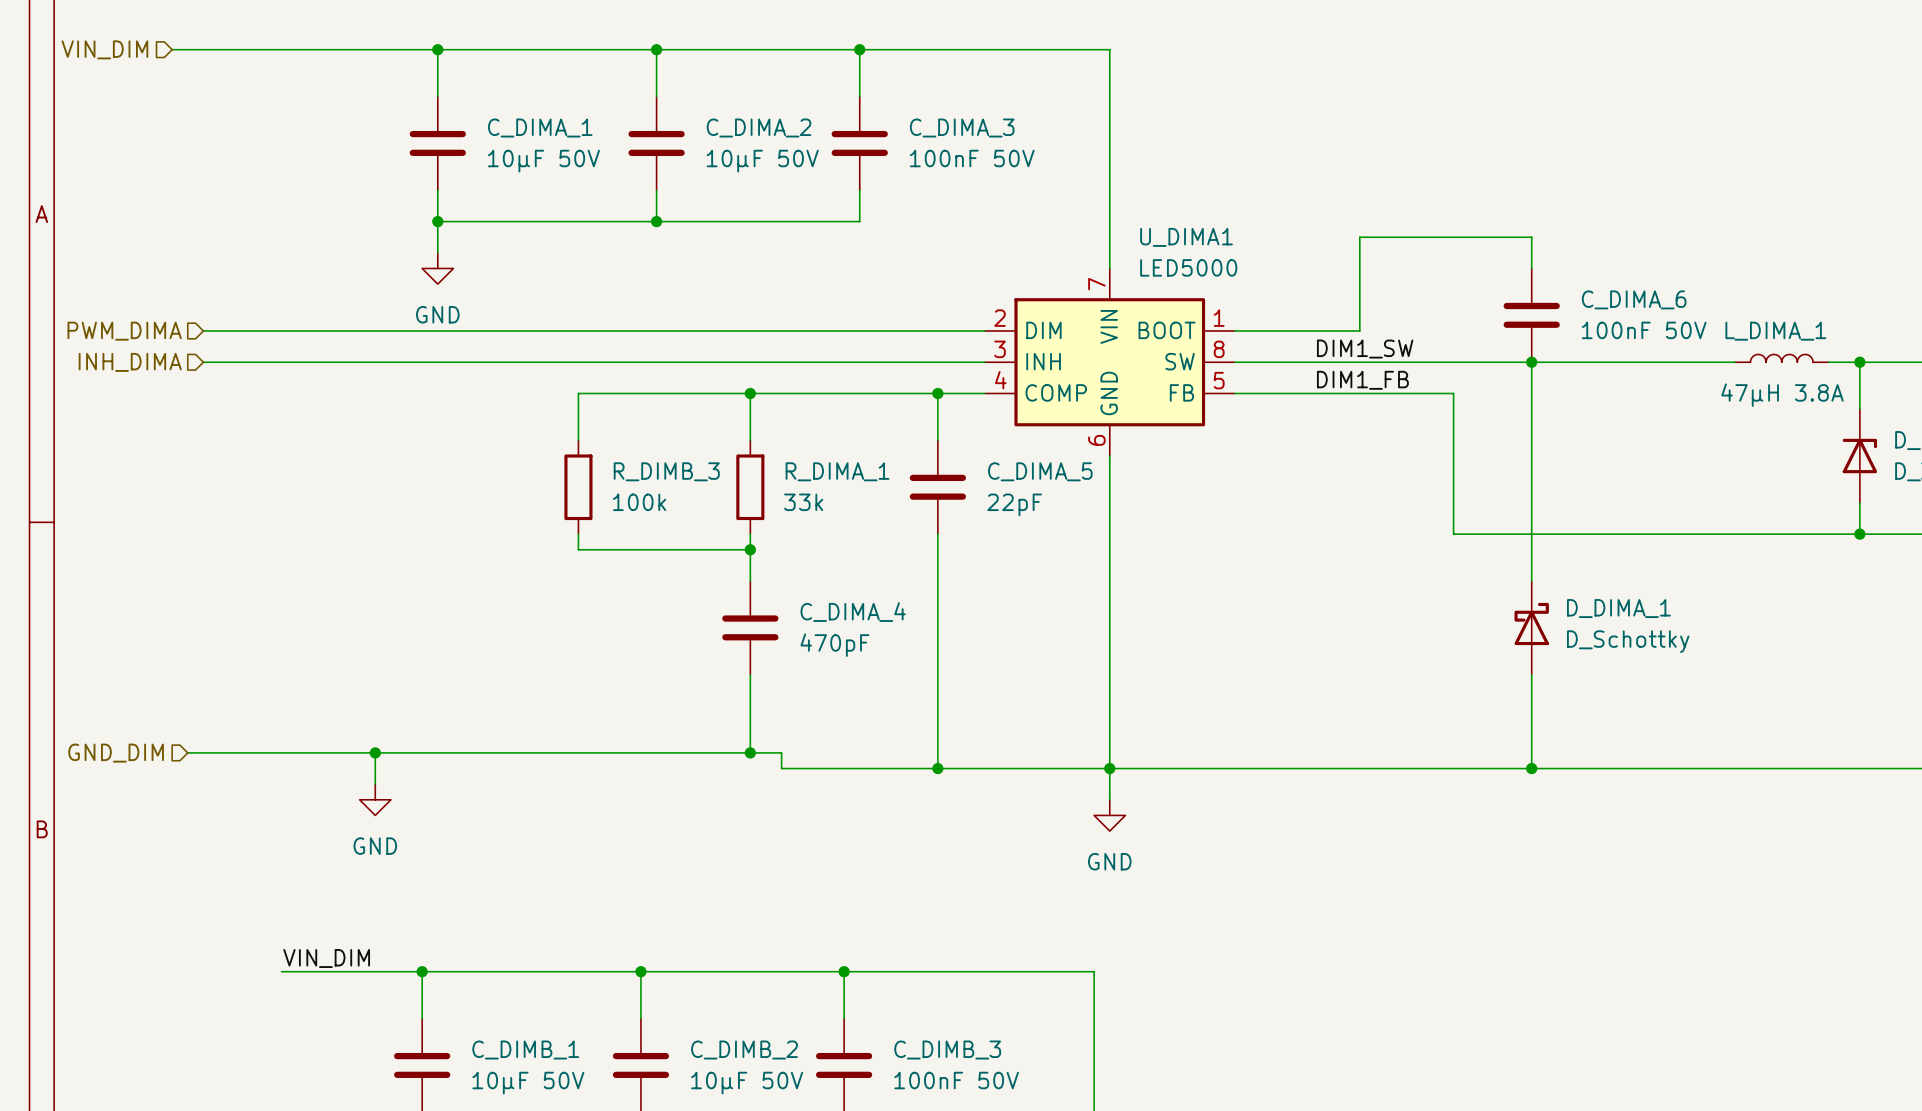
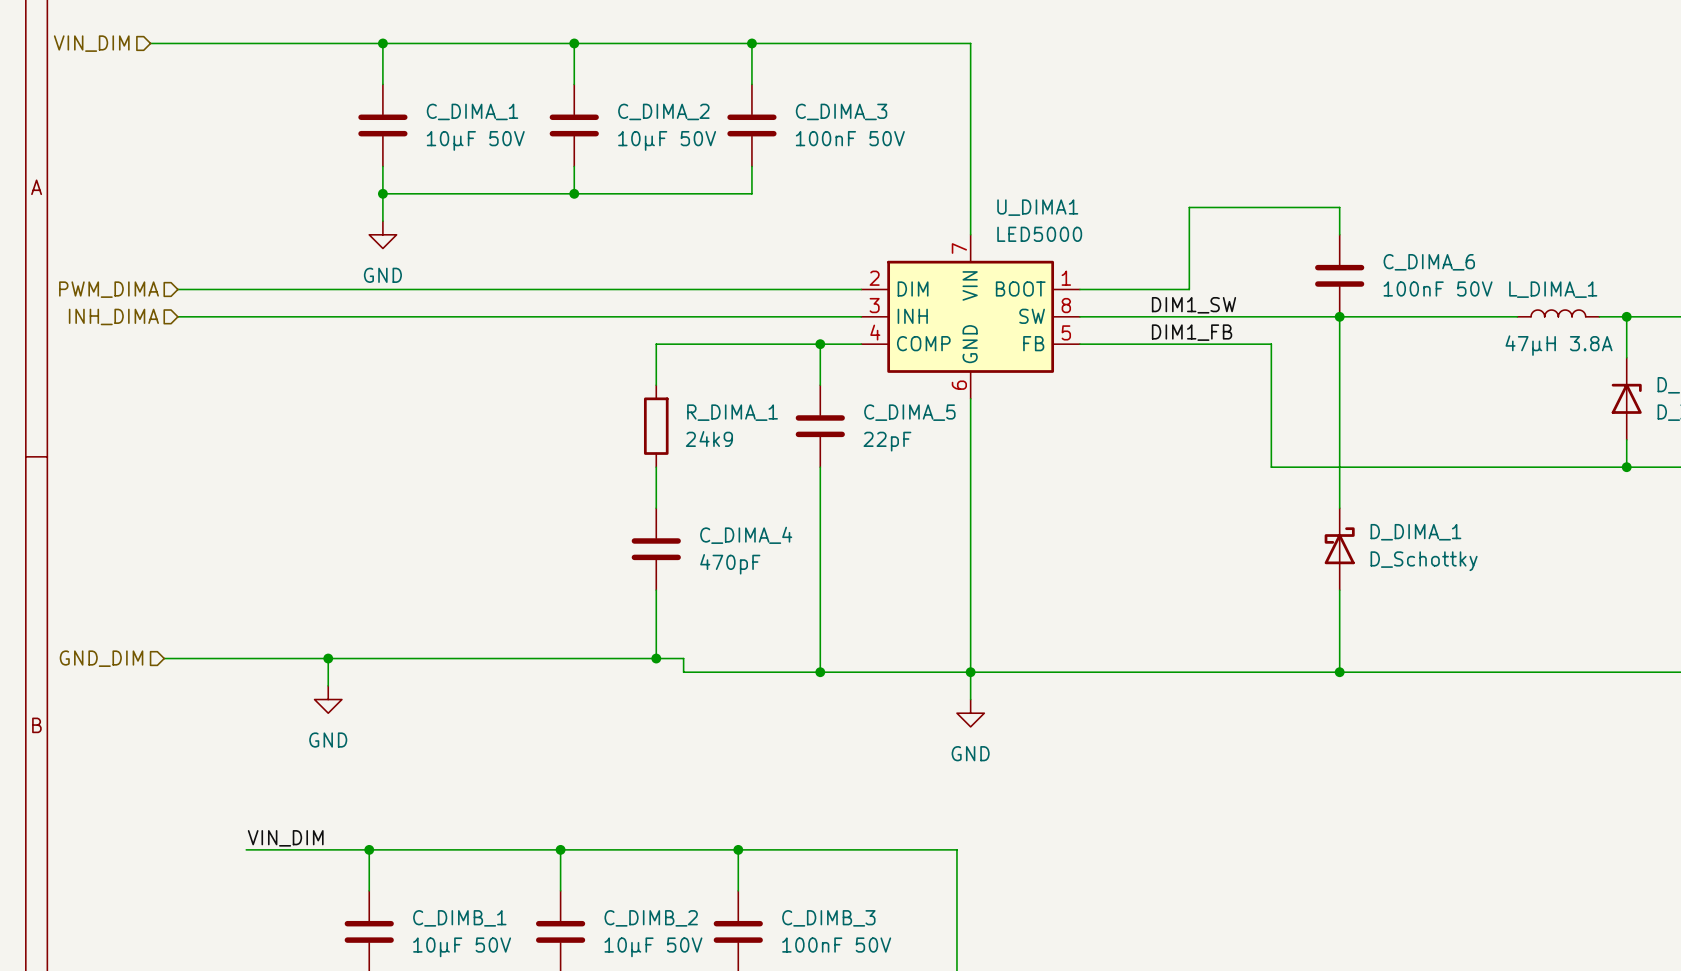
wire: (750, 393) (578, 393) (578, 440) -> none
junction: (750, 393) -> none
R_DIMB_3: 100k (578, 487) -> none
R_DIMA_1 value: 33k (803, 502) -> 24k9 (709, 439)
wire: (578, 534) (578, 549) (750, 549) -> none
junction: (750, 549) -> none

